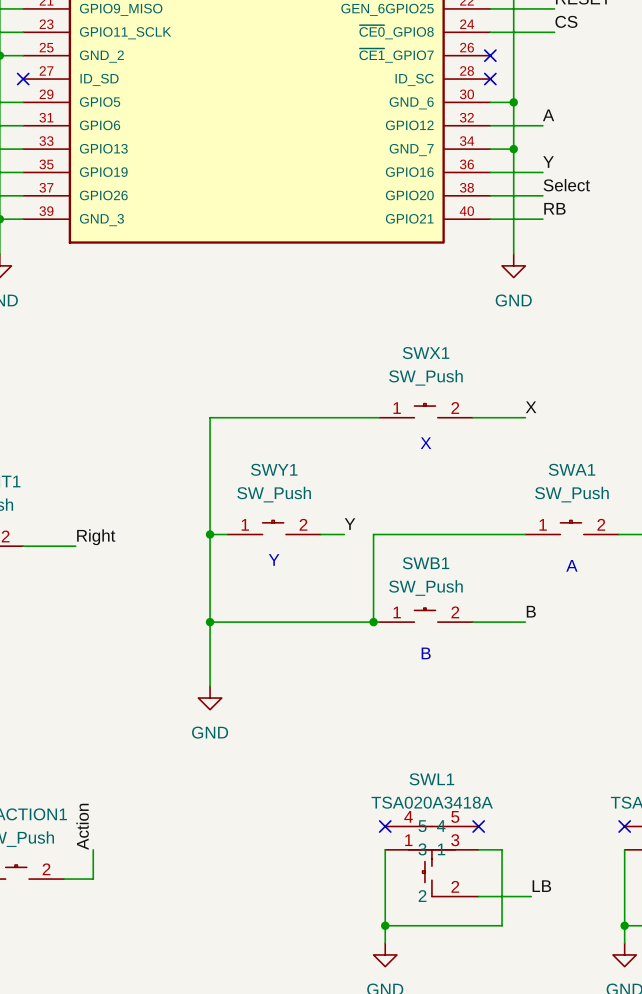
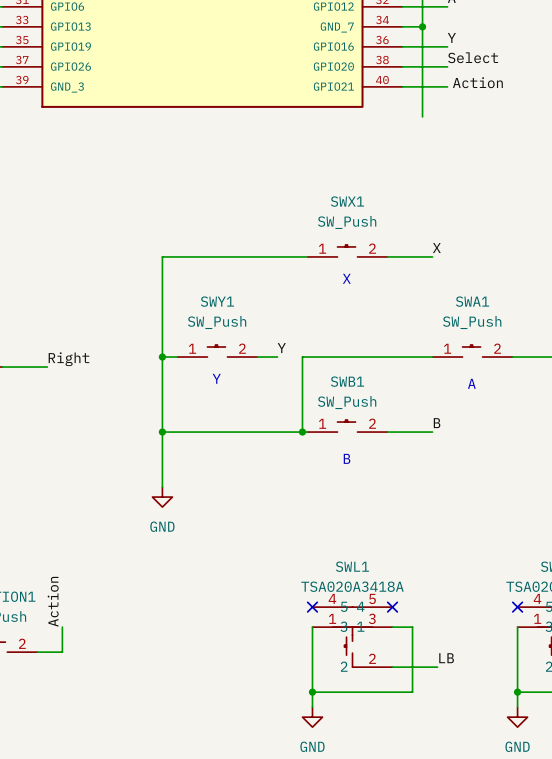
label: RB (554, 208) -> Action (477, 82)
power symbol: GND (513, 265) -> none

